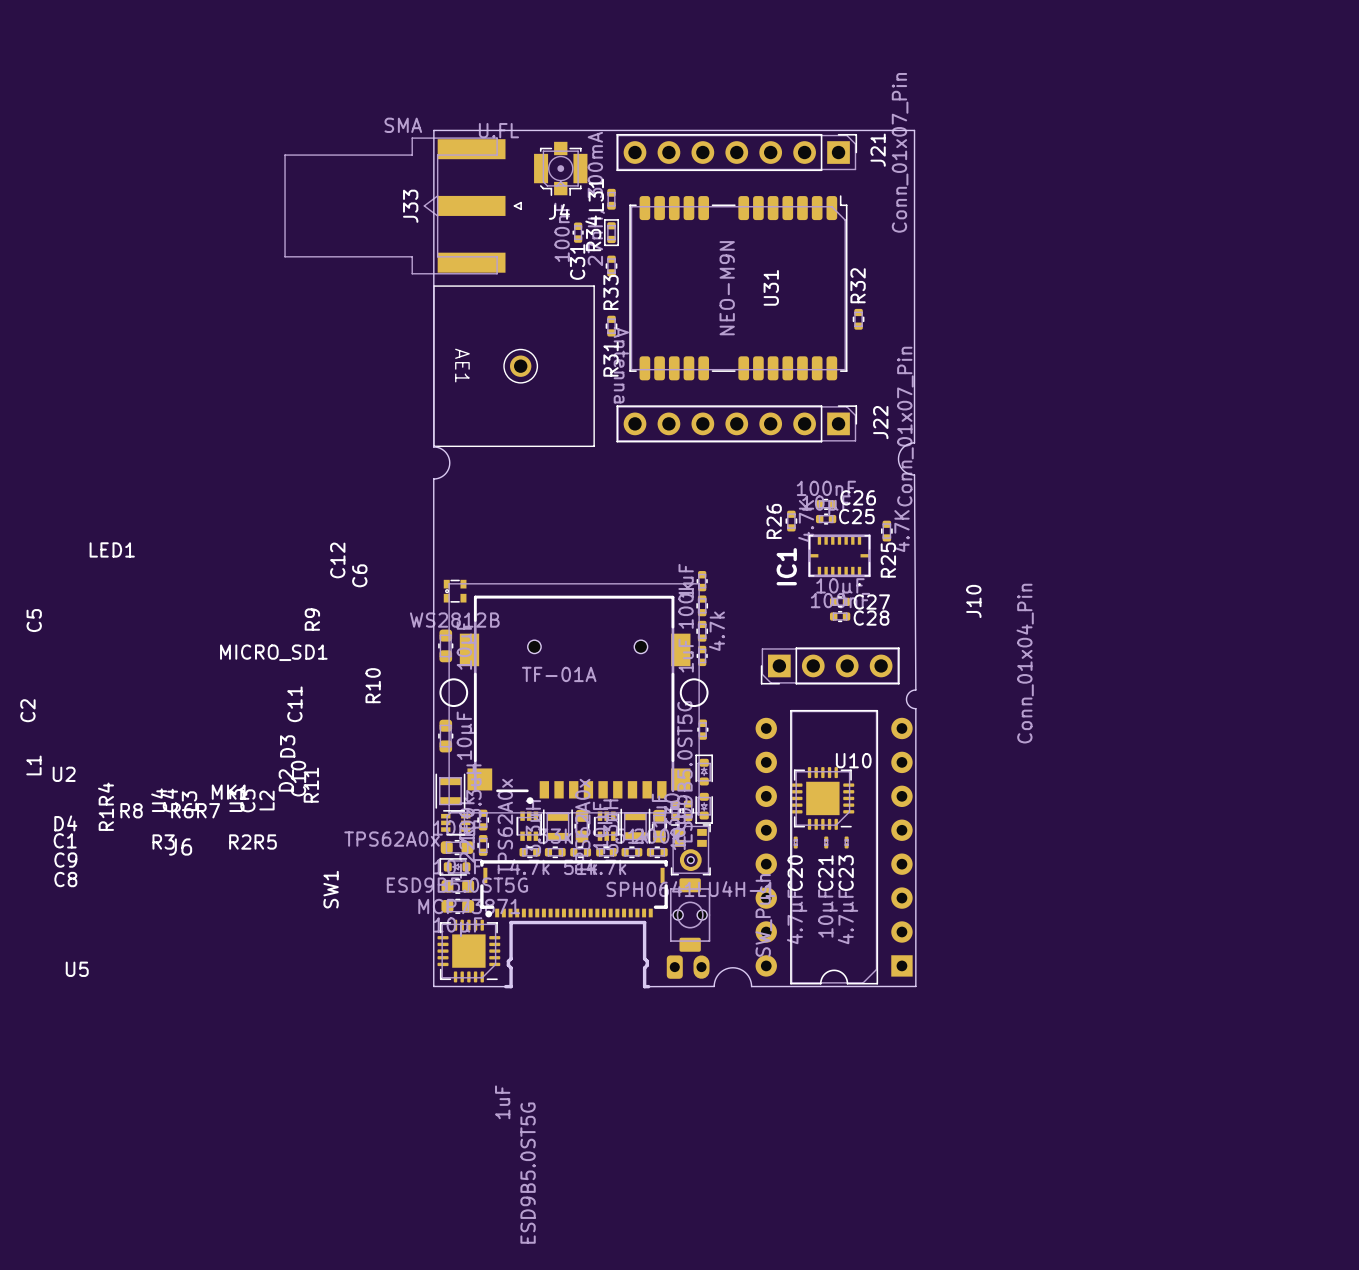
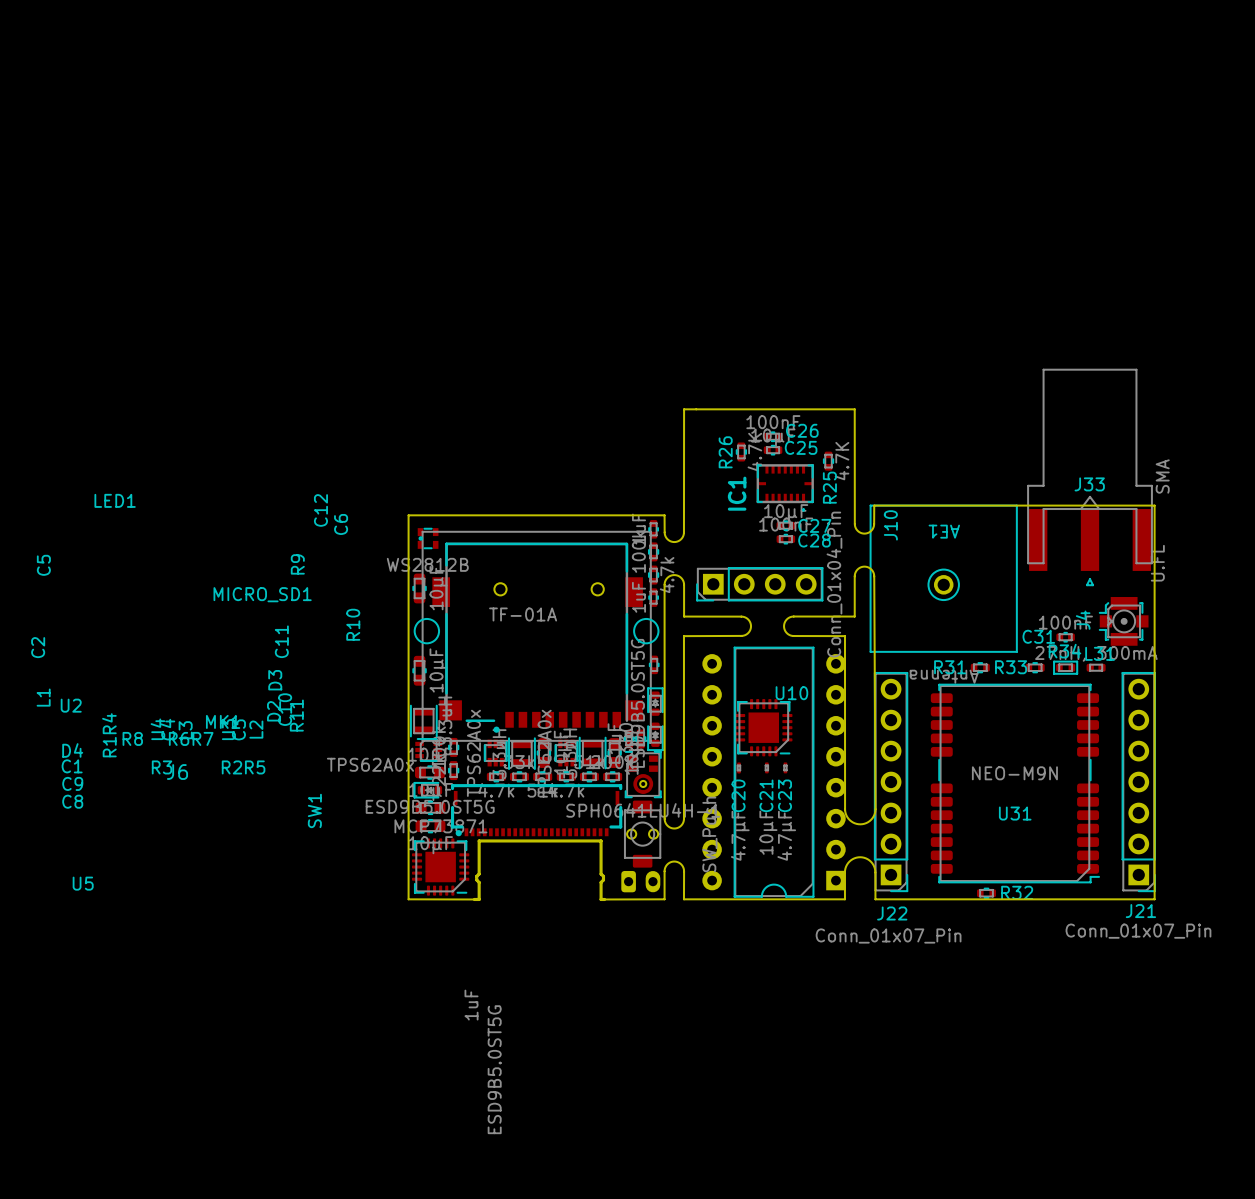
J21 rotation: 0° (736, 152) -> 90° clockwise (1138, 782)
J21 position: (736, 152) -> (1138, 782)
J4 rotation: 0° (560, 168) -> 90° clockwise (1123, 621)
J4 position: (560, 168) -> (1123, 621)
L31 rotation: 0° (611, 199) -> 90° clockwise (1096, 667)
L31 position: (611, 199) -> (1096, 667)
J33 rotation: 0° (403, 205) -> 90° clockwise (1090, 477)
J33 position: (403, 205) -> (1090, 477)
C31 rotation: 0° (578, 232) -> 90° clockwise (1065, 637)
C31 position: (578, 232) -> (1065, 637)
R34 rotation: 0° (611, 232) -> 90° clockwise (1065, 667)
R34 position: (611, 232) -> (1065, 667)
R33 rotation: 0° (611, 266) -> 90° clockwise (1035, 667)
R33 position: (611, 266) -> (1035, 667)
U31 rotation: 0° (738, 287) -> 90° clockwise (1015, 783)
U31 position: (738, 287) -> (1015, 783)
R32 rotation: 0° (858, 319) -> 90° clockwise (986, 893)
R32 position: (858, 319) -> (986, 893)
R31 rotation: 0° (611, 326) -> 90° clockwise (980, 667)
R31 position: (611, 326) -> (980, 667)
AE1 rotation: 0° (514, 366) -> 90° clockwise (943, 578)
AE1 position: (514, 366) -> (943, 578)
J22 rotation: 0° (736, 423) -> 90° clockwise (891, 782)
J22 position: (736, 423) -> (891, 782)
C26 position: (826, 504) -> (773, 436)
C25 position: (826, 519) -> (773, 450)
R26 position: (791, 521) -> (741, 451)
R25 position: (886, 531) -> (828, 461)
IC1 position: (839, 560) -> (785, 487)
board edge: (433, 565) (433, 478) (445, 474) (449, 462) (445, 451) (433, 446) (433, 130) (914, 130) (914, 442) (903, 446) (898, 458) (902, 469) (914, 474) (915, 689) (909, 692) (906, 699) (909, 705) (915, 708) (915, 986) (751, 986) (746, 974) (741, 969) (732, 967) (724, 969) (718, 974) (714, 986) -> (408, 515) (664, 515) (665, 536) (670, 541) (677, 541) (682, 537) (683, 532) (684, 409) (854, 409) (854, 523) (856, 529) (862, 533) (868, 532) (873, 527) (874, 505) (1154, 505) (1154, 899) (875, 899) (874, 866) (869, 860) (860, 857) (850, 860) (846, 866) (844, 899) (683, 899) (683, 868) (680, 863) (674, 861) (668, 863) (664, 868) (664, 899)
C27 position: (840, 601) -> (785, 525)
C28 position: (840, 616) -> (785, 539)
board edge: none -> (854, 576) (854, 616) (792, 616) (786, 619) (784, 626) (786, 632) (792, 635) (844, 636) (845, 809) (849, 820) (860, 824) (871, 819) (875, 809) (874, 576) (871, 569) (864, 566) (857, 569) (854, 576)
board edge: none -> (664, 584) (664, 818) (667, 825) (674, 828) (681, 825) (683, 818) (683, 636) (742, 635) (748, 632) (751, 626) (748, 619) (742, 616) (684, 616) (682, 579) (678, 575) (671, 575) (666, 578) (664, 584)
J10 value position: Conn_01x04_Pin (1025, 663) -> Conn_01x04_Pin (834, 584)
J10 position: (830, 665) -> (759, 584)

